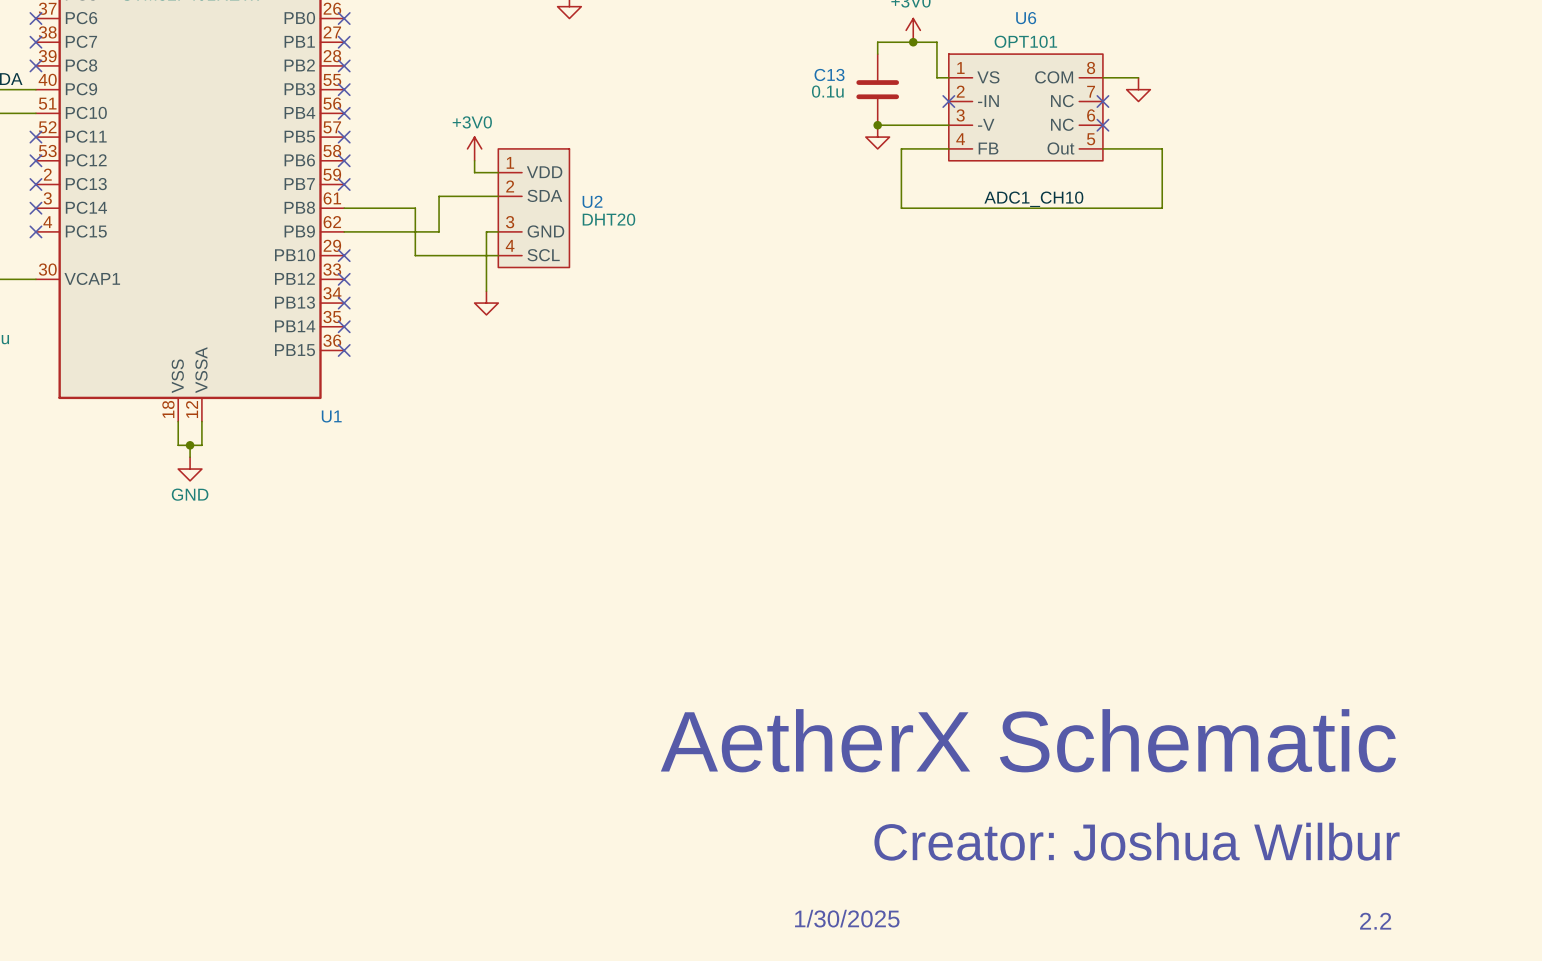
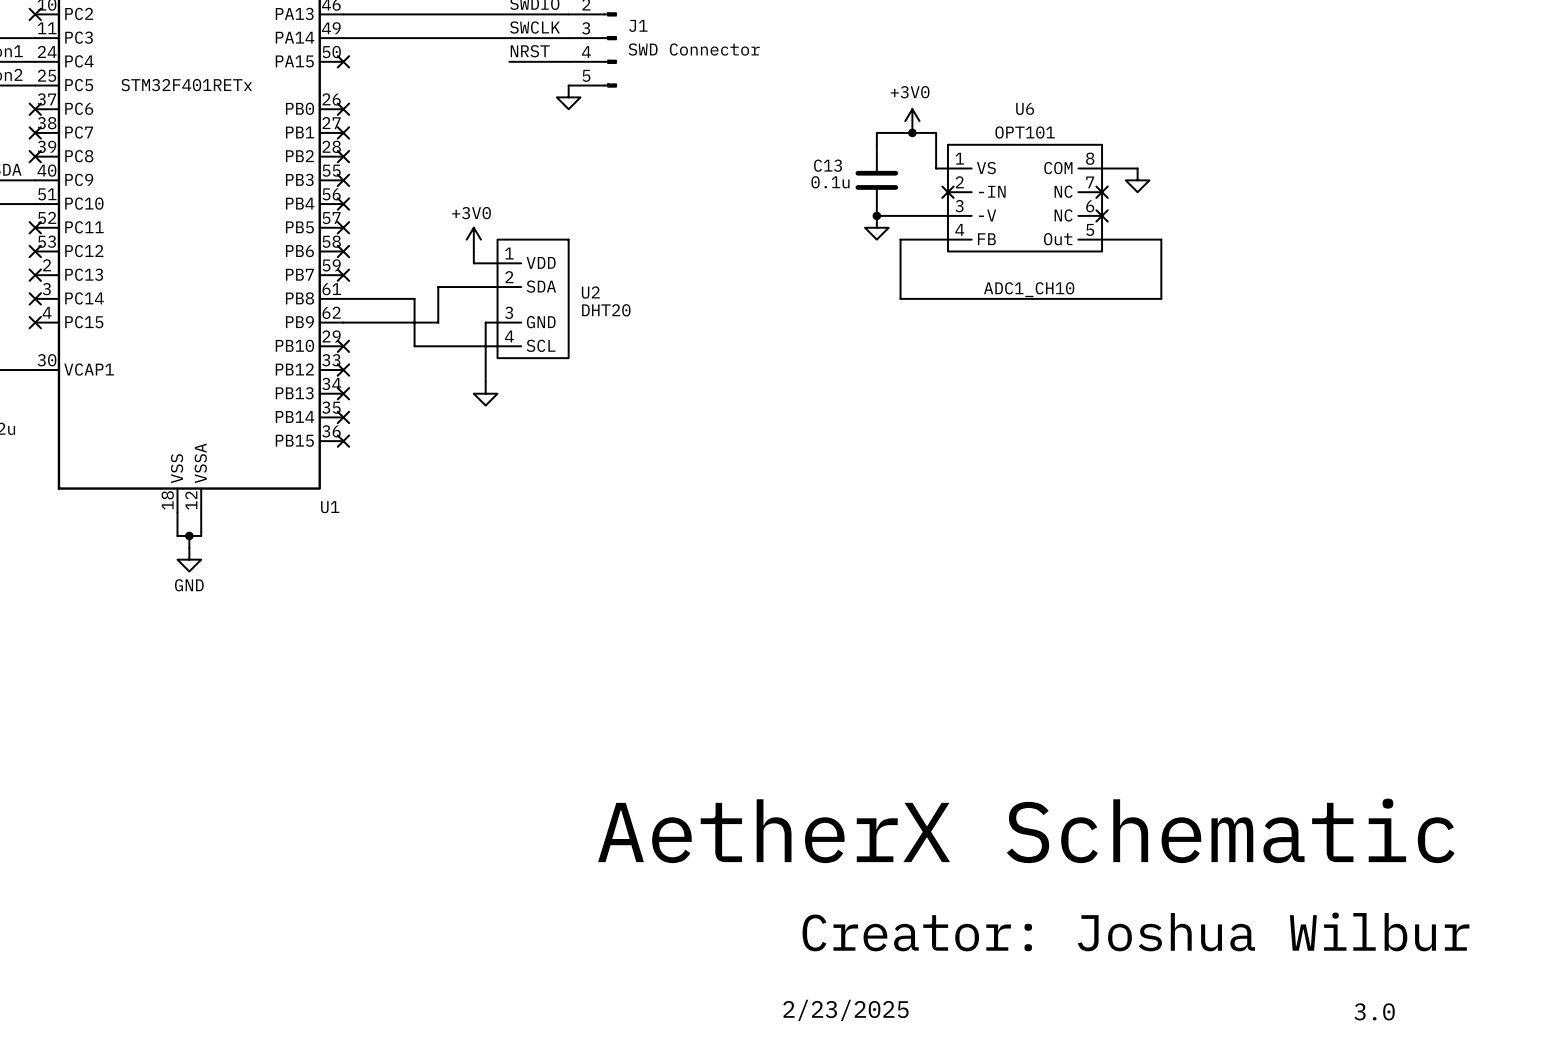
text: 1/30/2025 (847, 918) -> 2/23/2025 (846, 1010)
text: 2.2 (1375, 921) -> 3.0 (1374, 1011)

